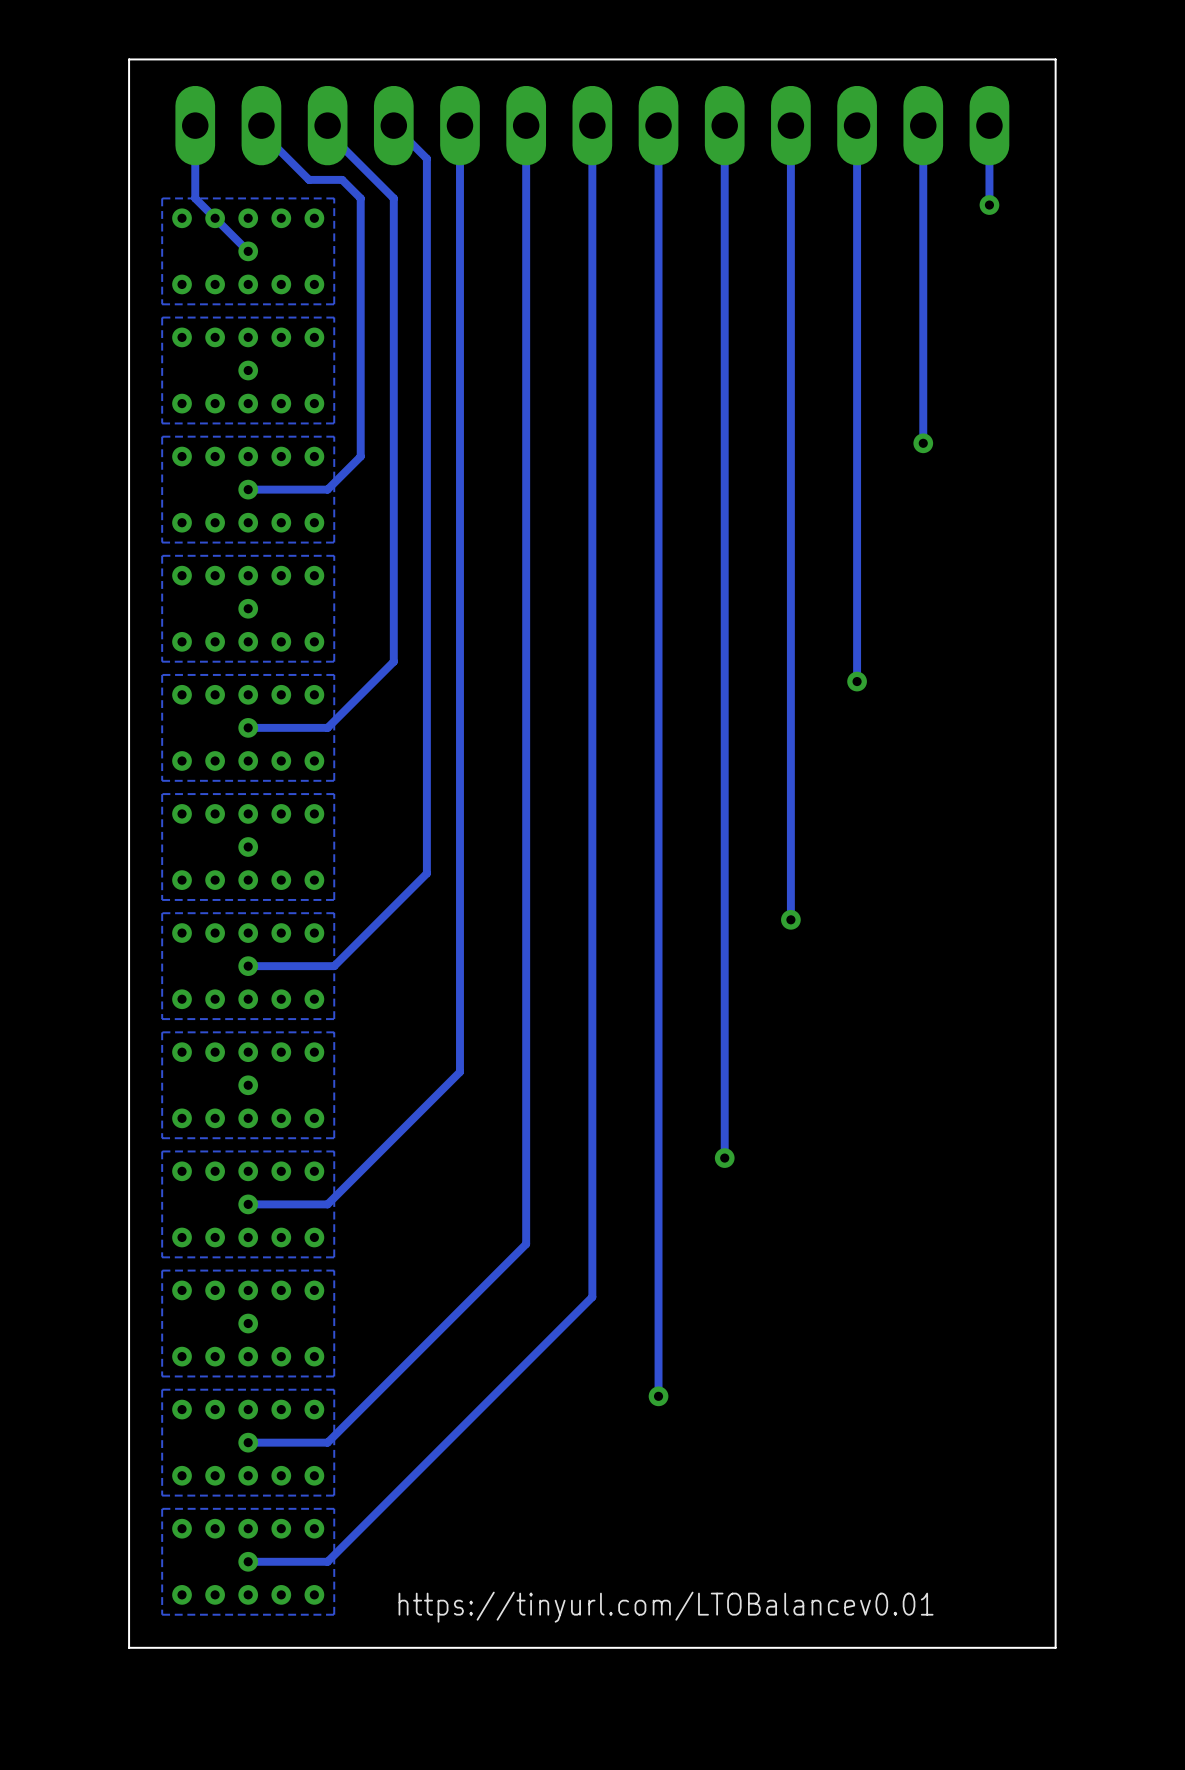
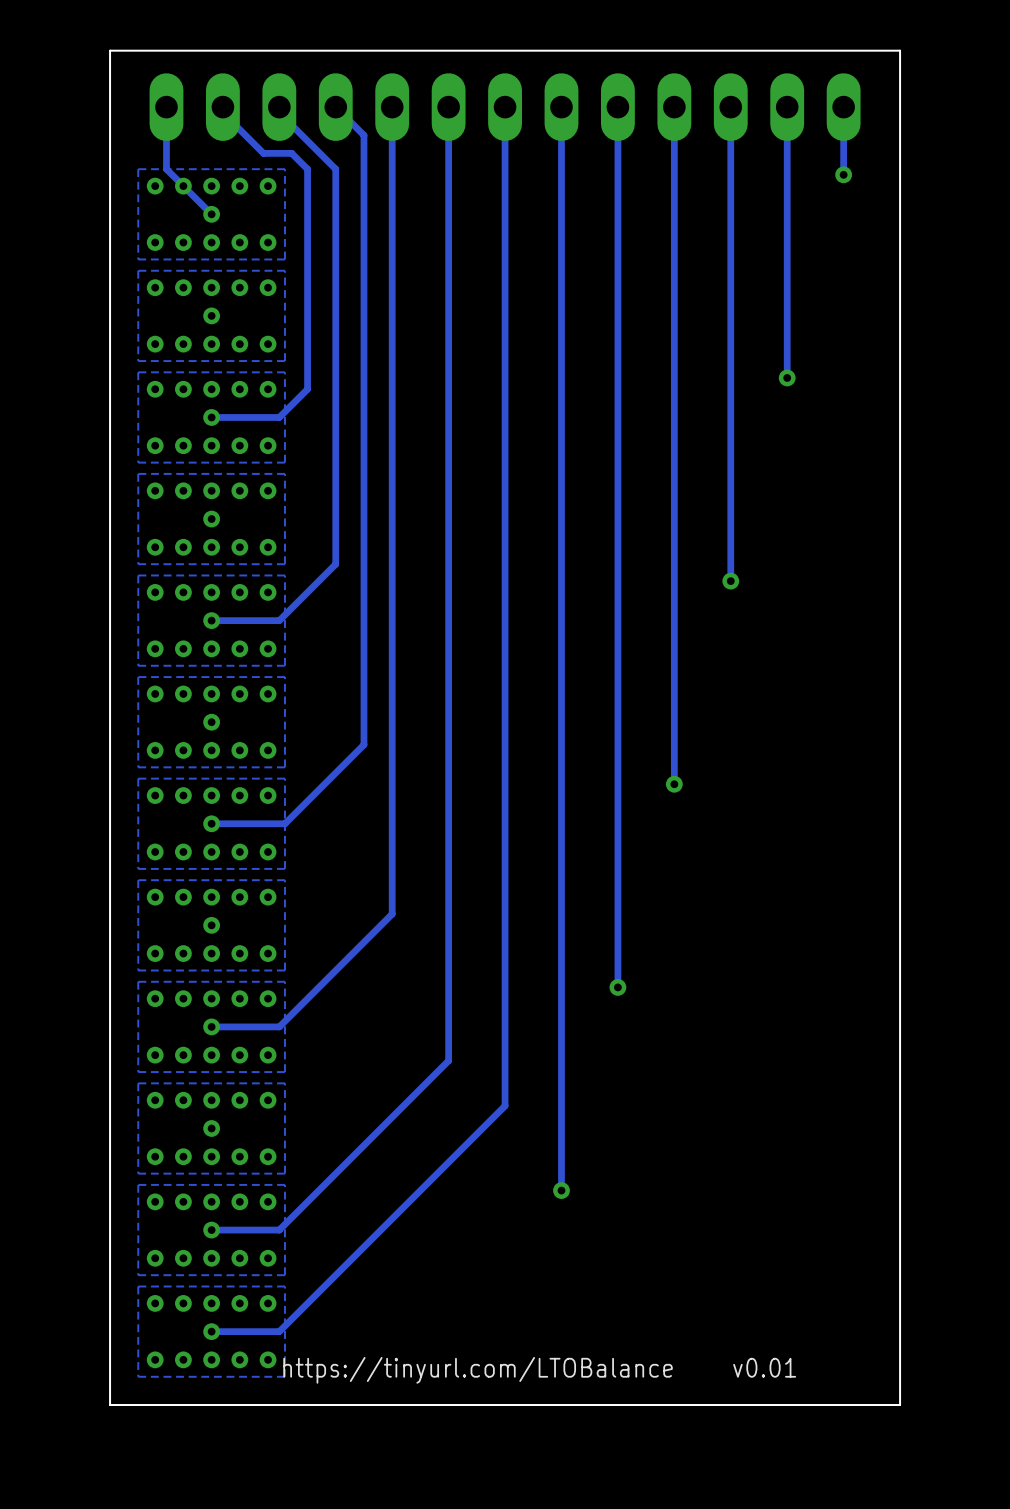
text position: https://tinyurl.com/LTOBalance (626, 1607) -> https://tinyurl.com/LTOBalance (478, 1370)

